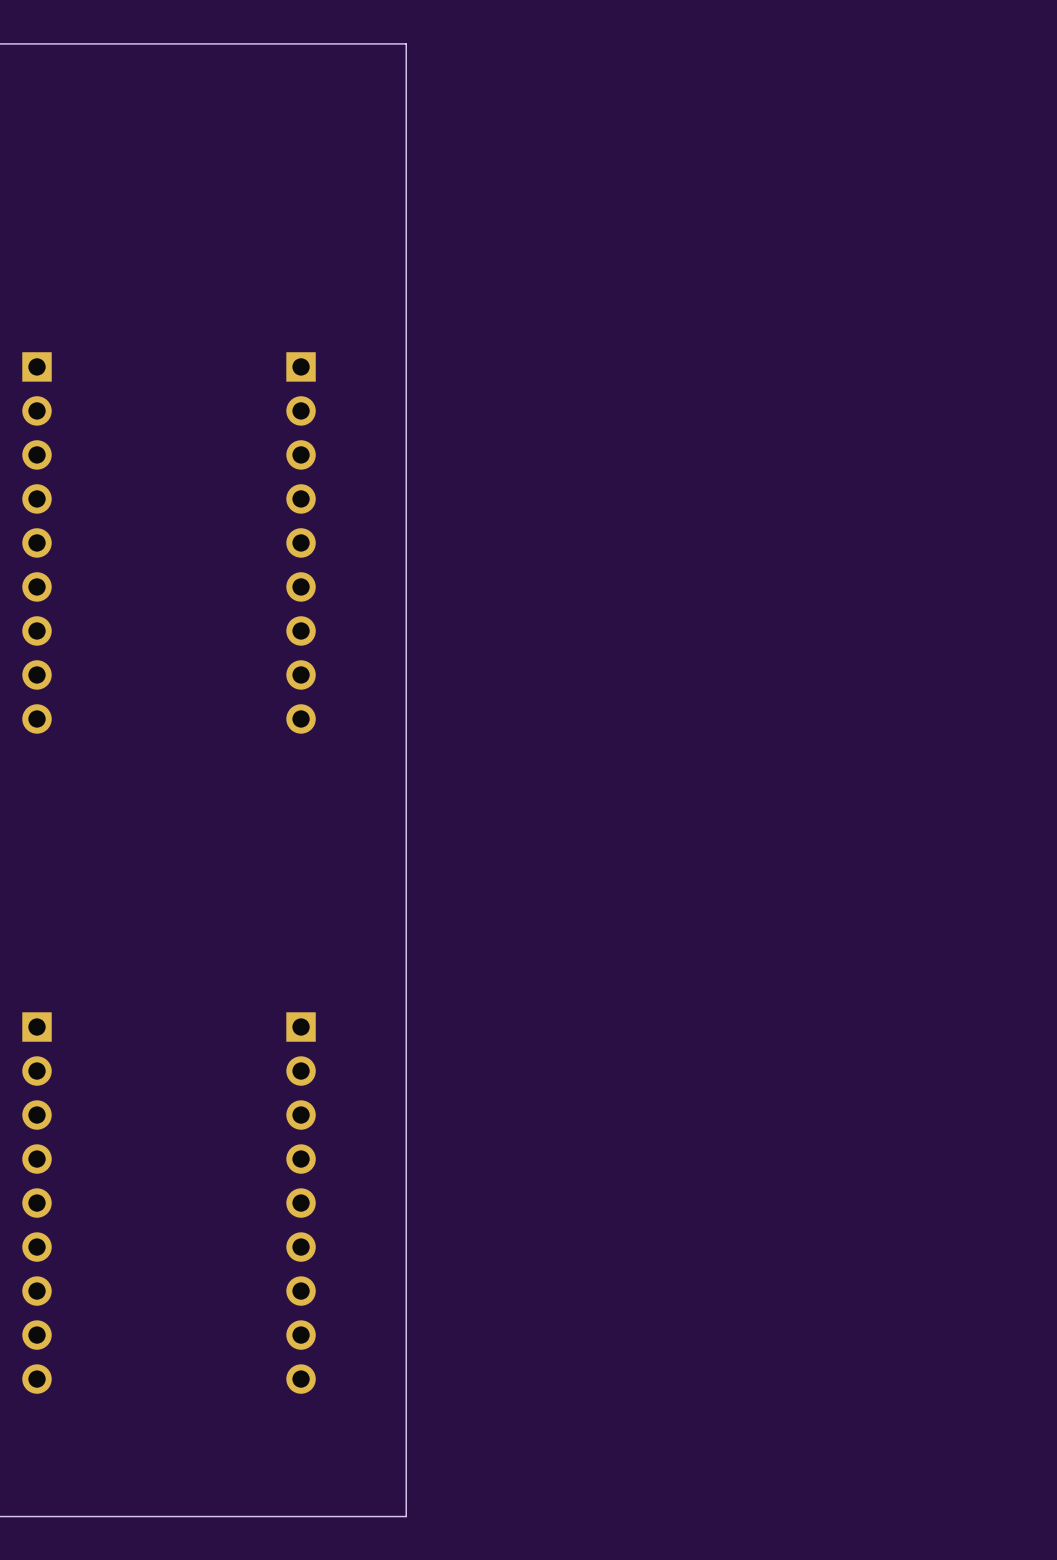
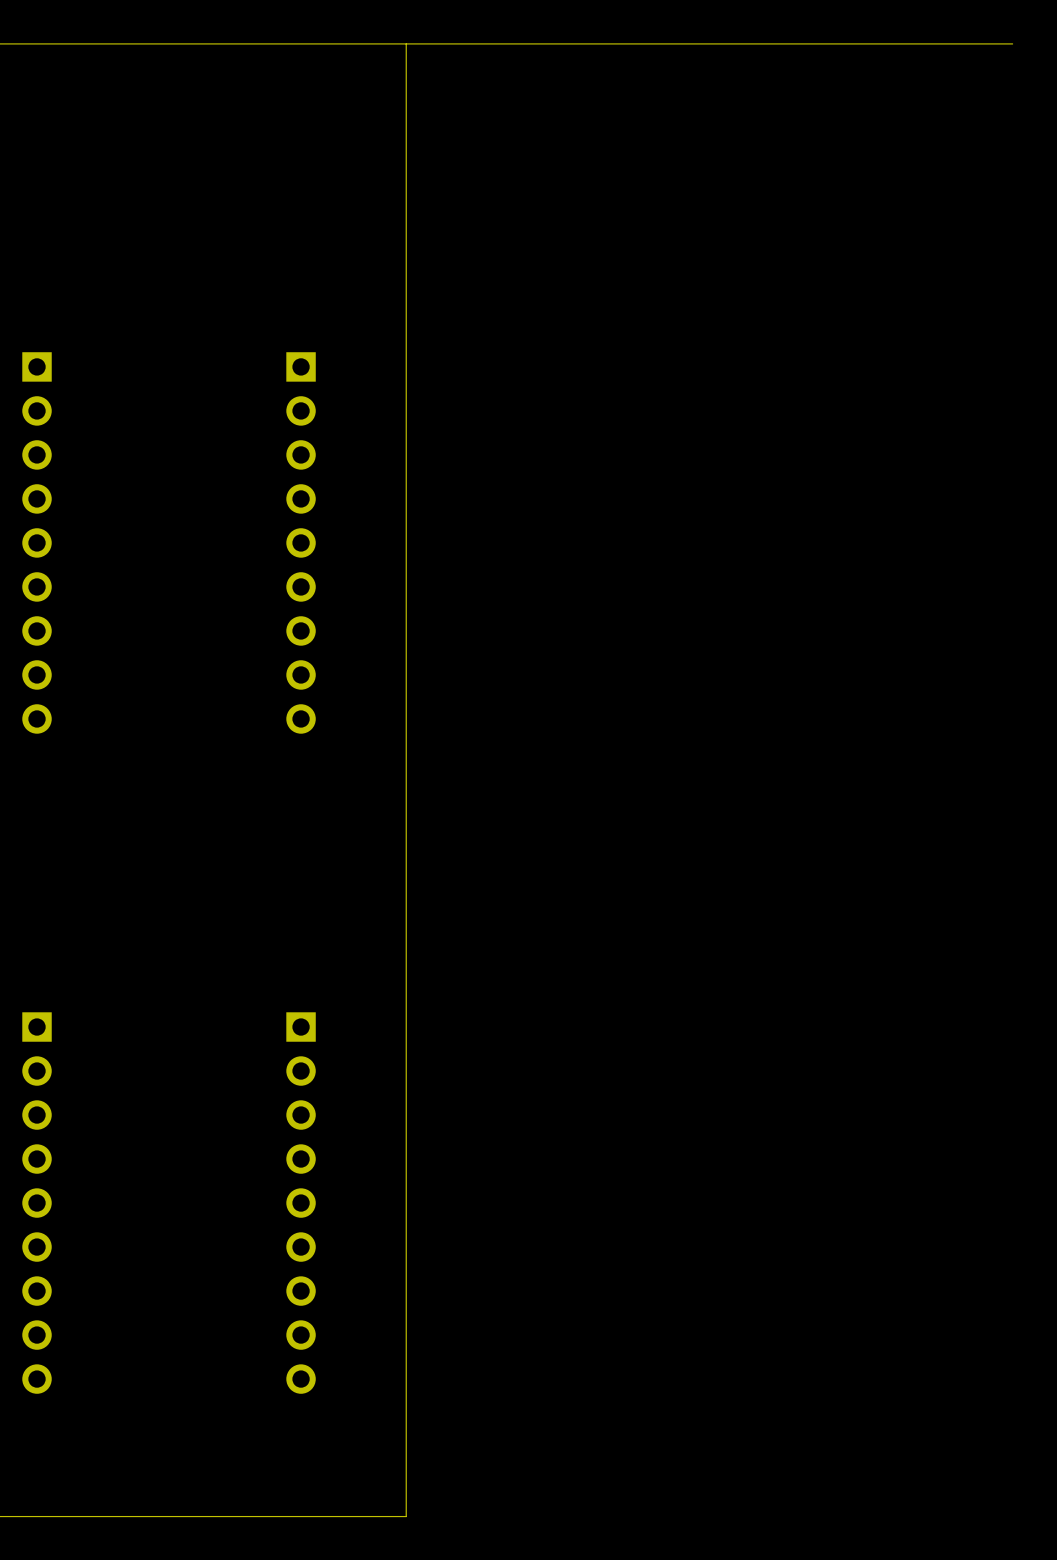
board edge: none -> (1012, 43) (406, 43)

